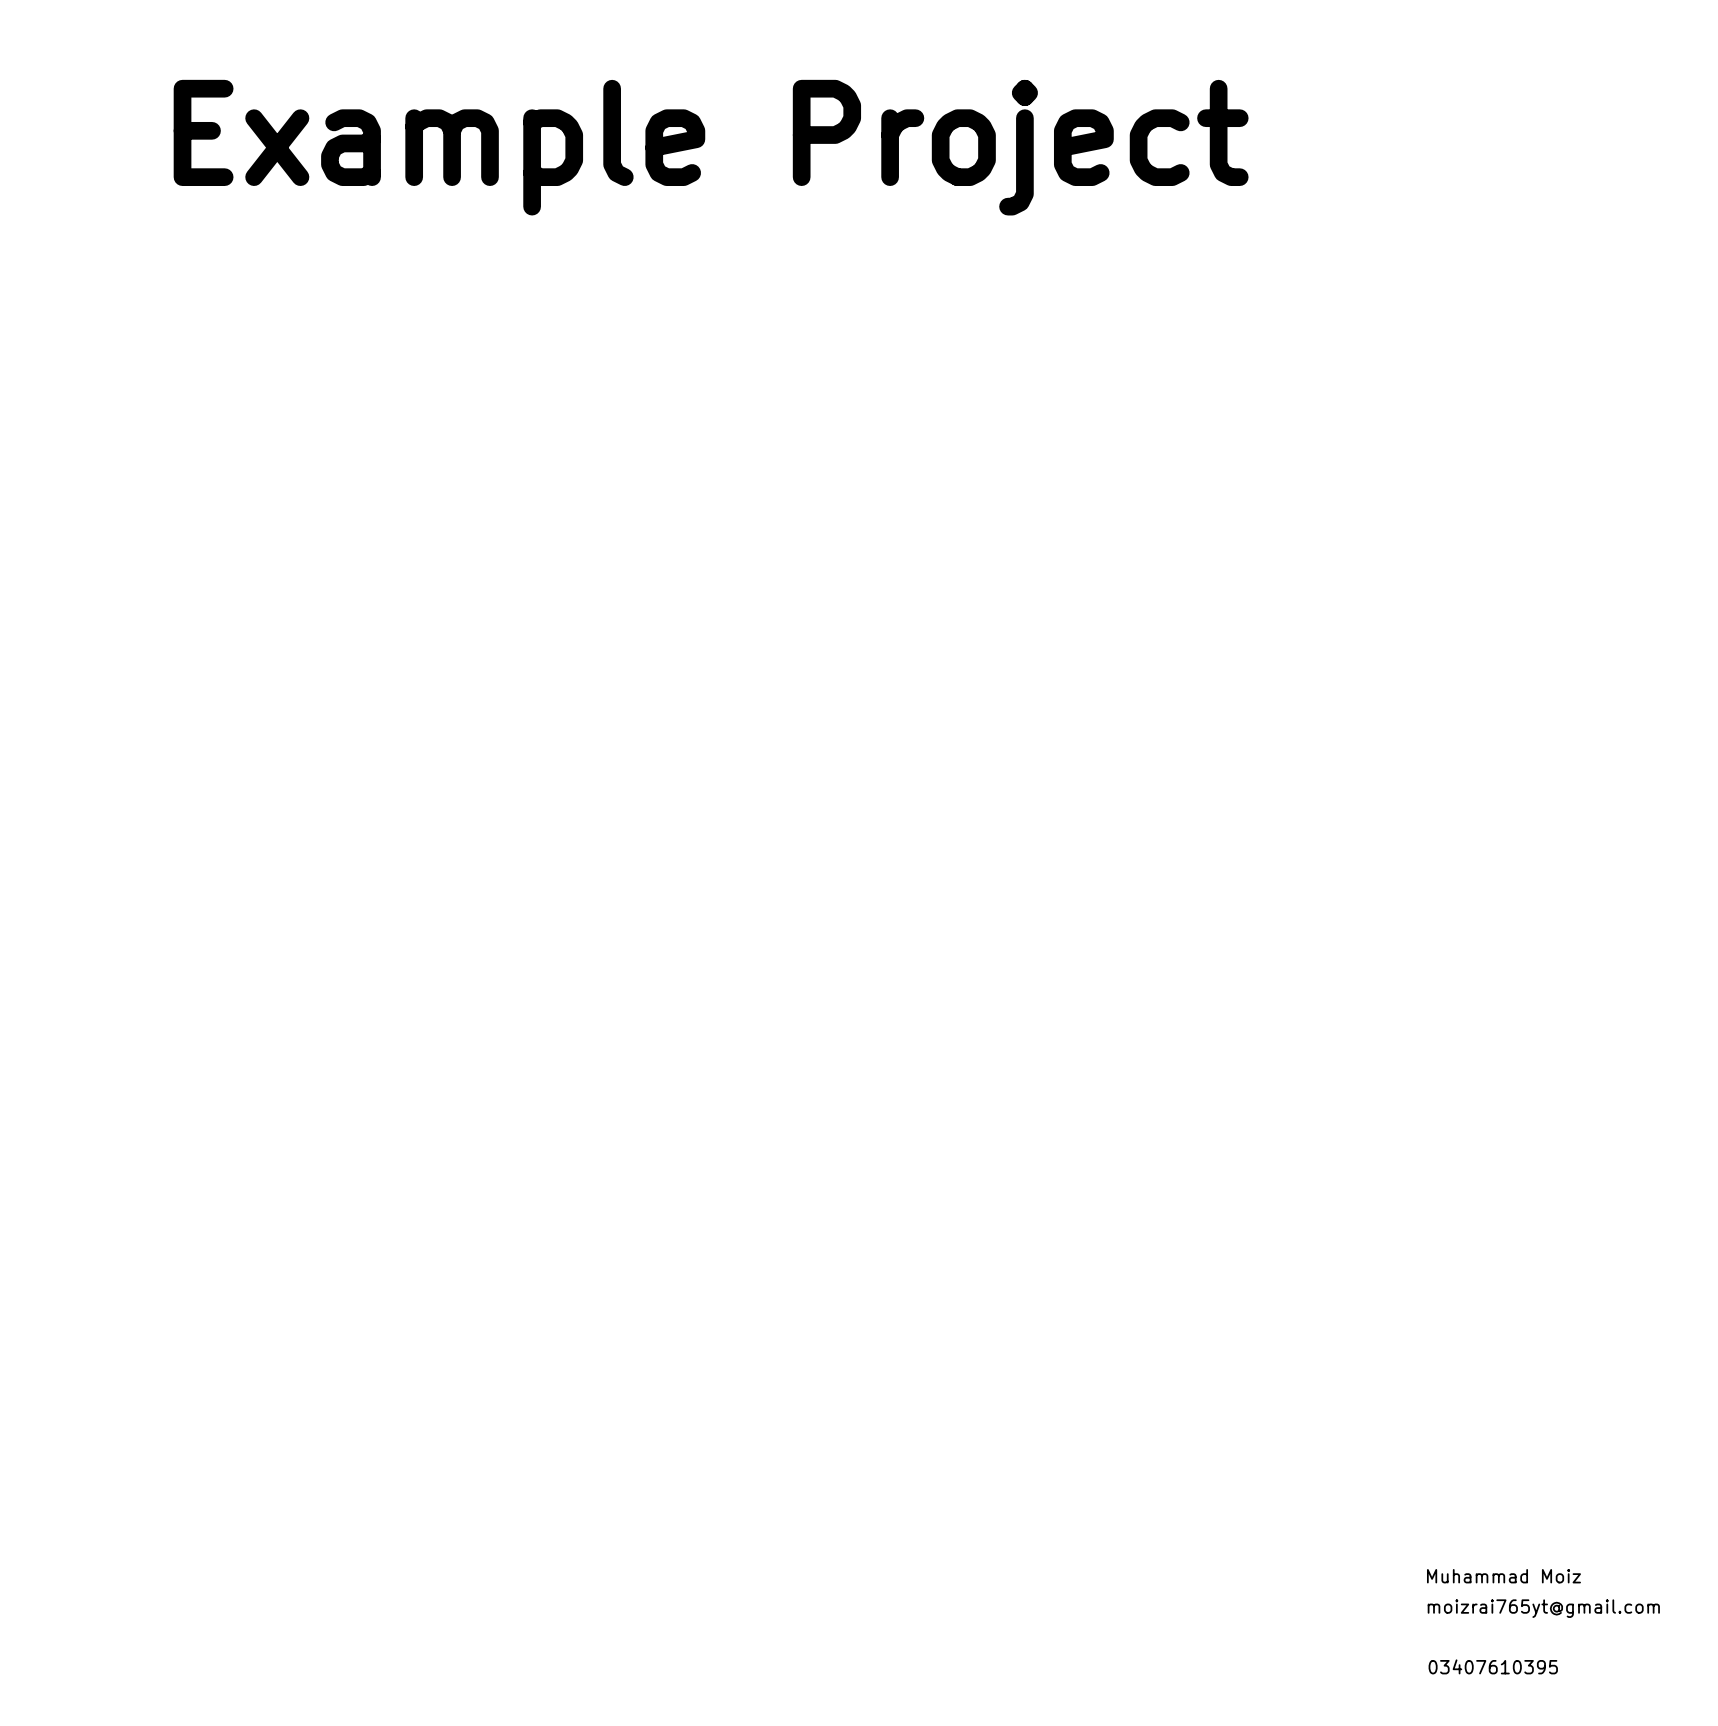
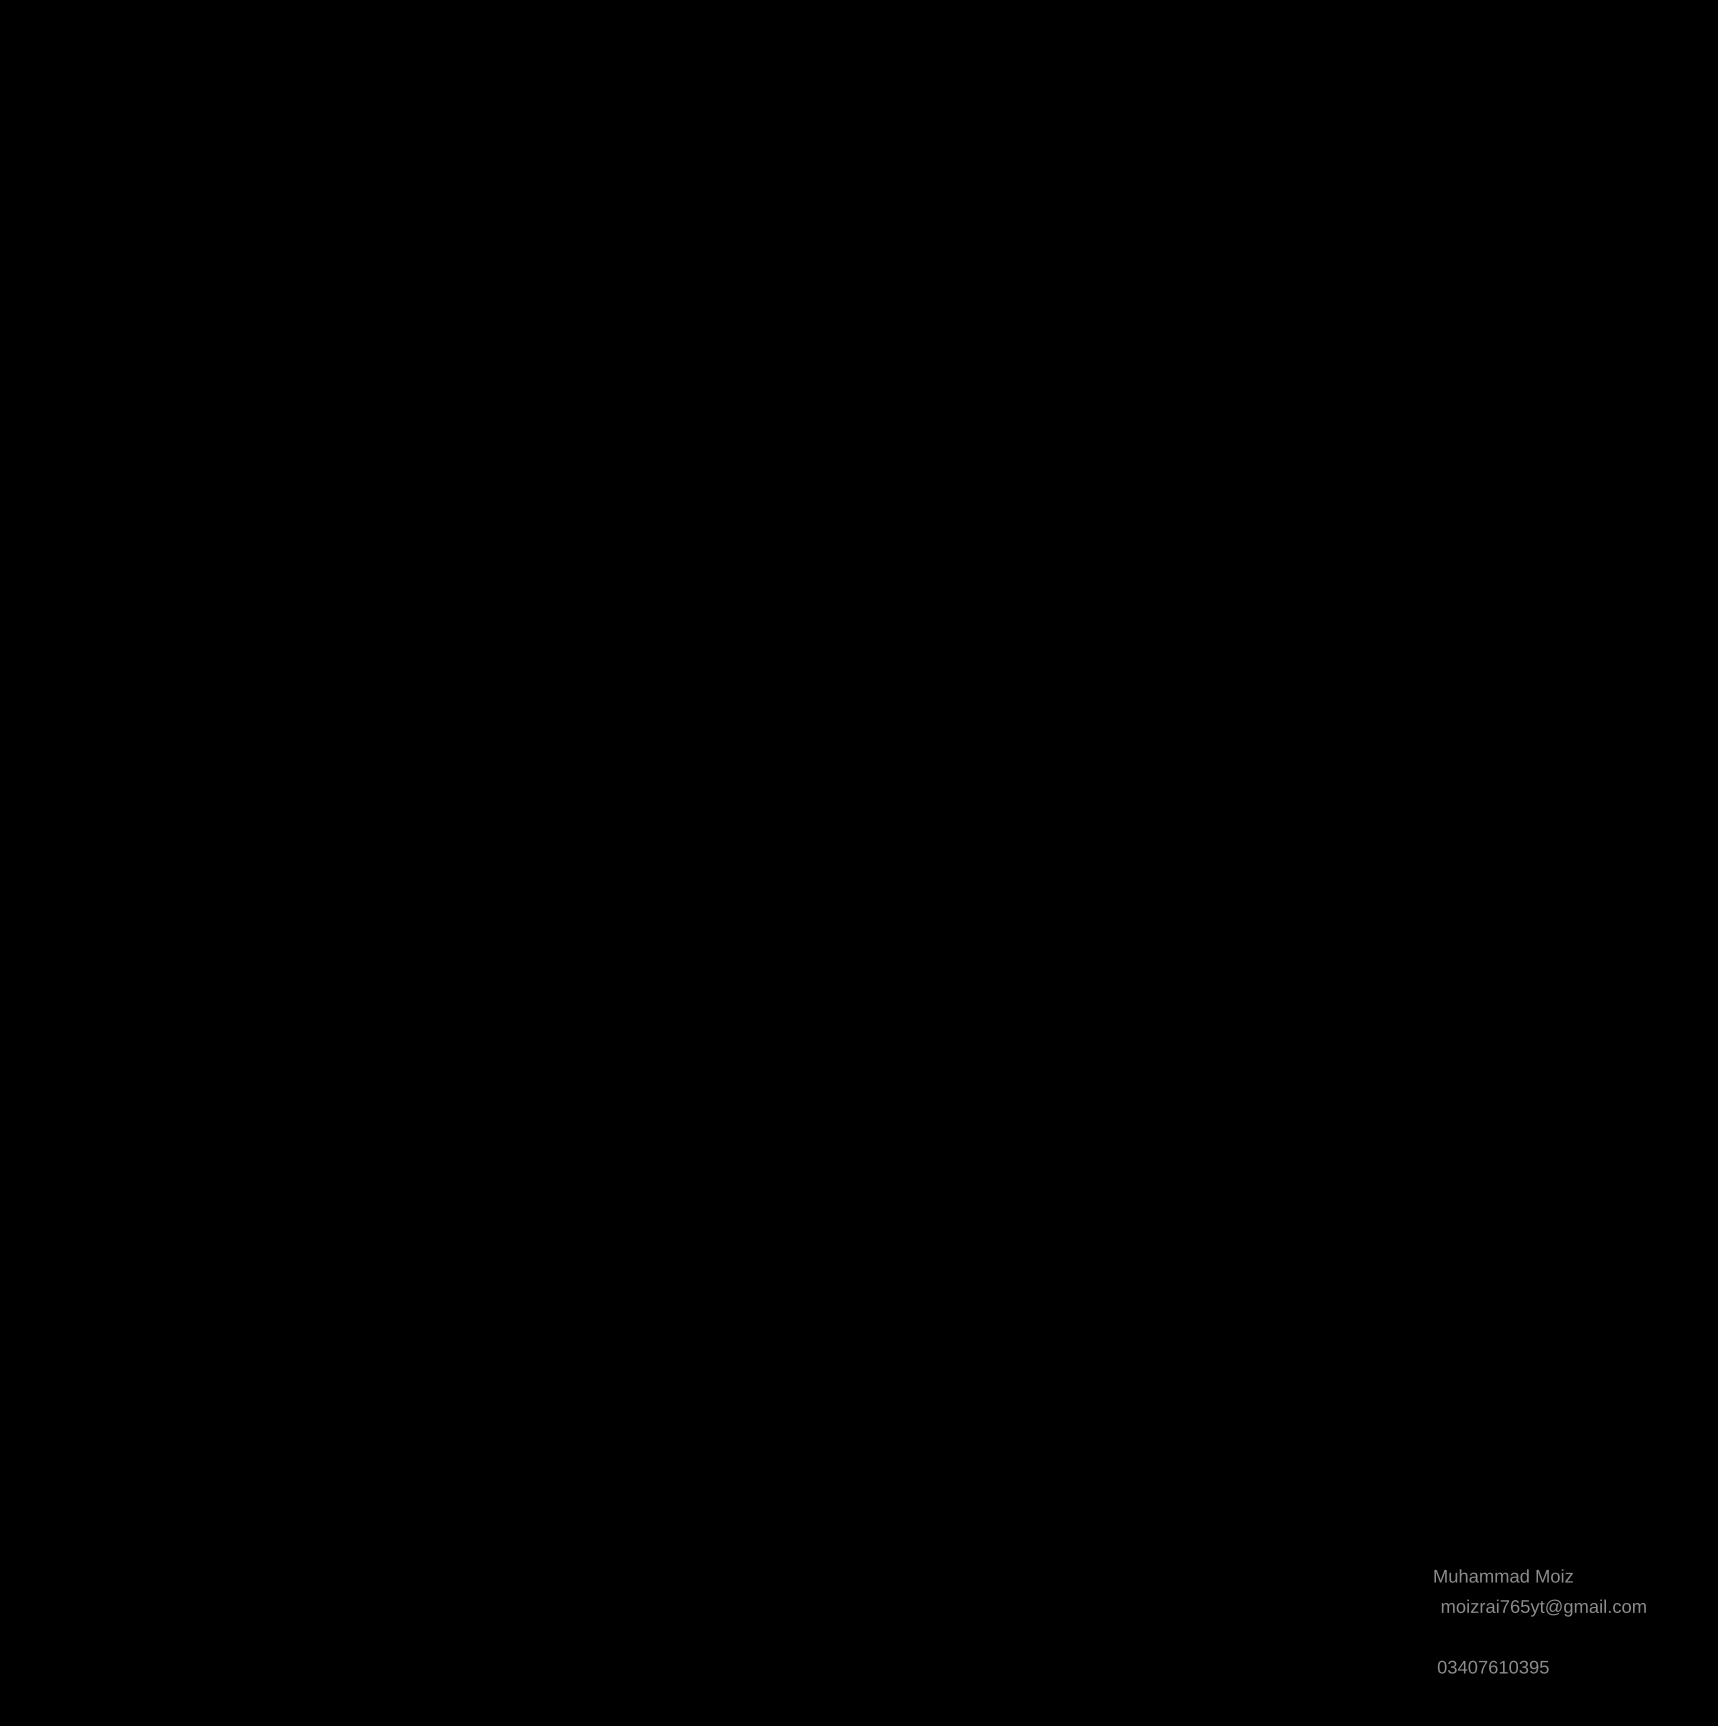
text: Example Project (711, 147) -> none

